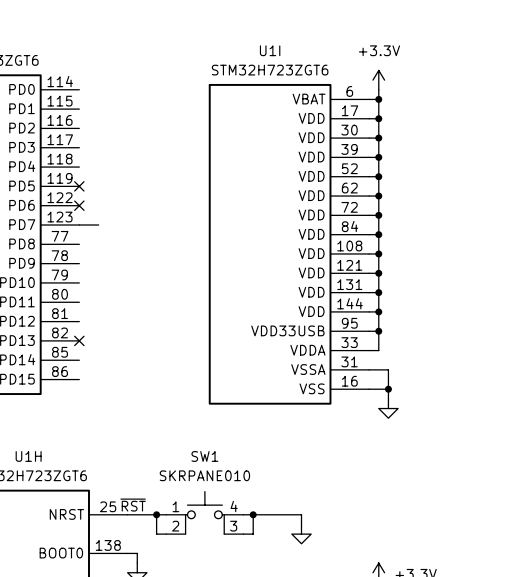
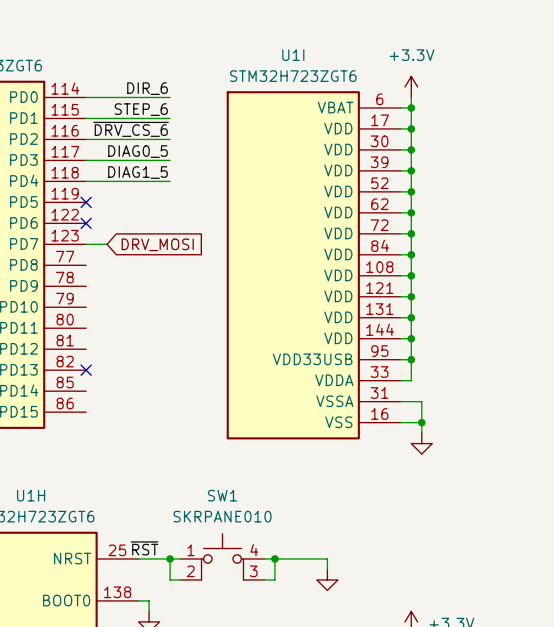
label: none -> DIR_6 (147, 88)
wire: none -> (86, 97) (170, 97)
label: none -> STEP_6 (141, 109)
wire: none -> (86, 118) (170, 118)
label: none -> ~{DRV_CS_6} (131, 129)
wire: none -> (86, 139) (170, 139)
label: none -> DIAG0_5 (138, 151)
wire: none -> (86, 160) (170, 160)
label: none -> DIAG1_5 (138, 172)
wire: none -> (86, 181) (170, 181)
global label: none -> DRV_MOSI (157, 244)

